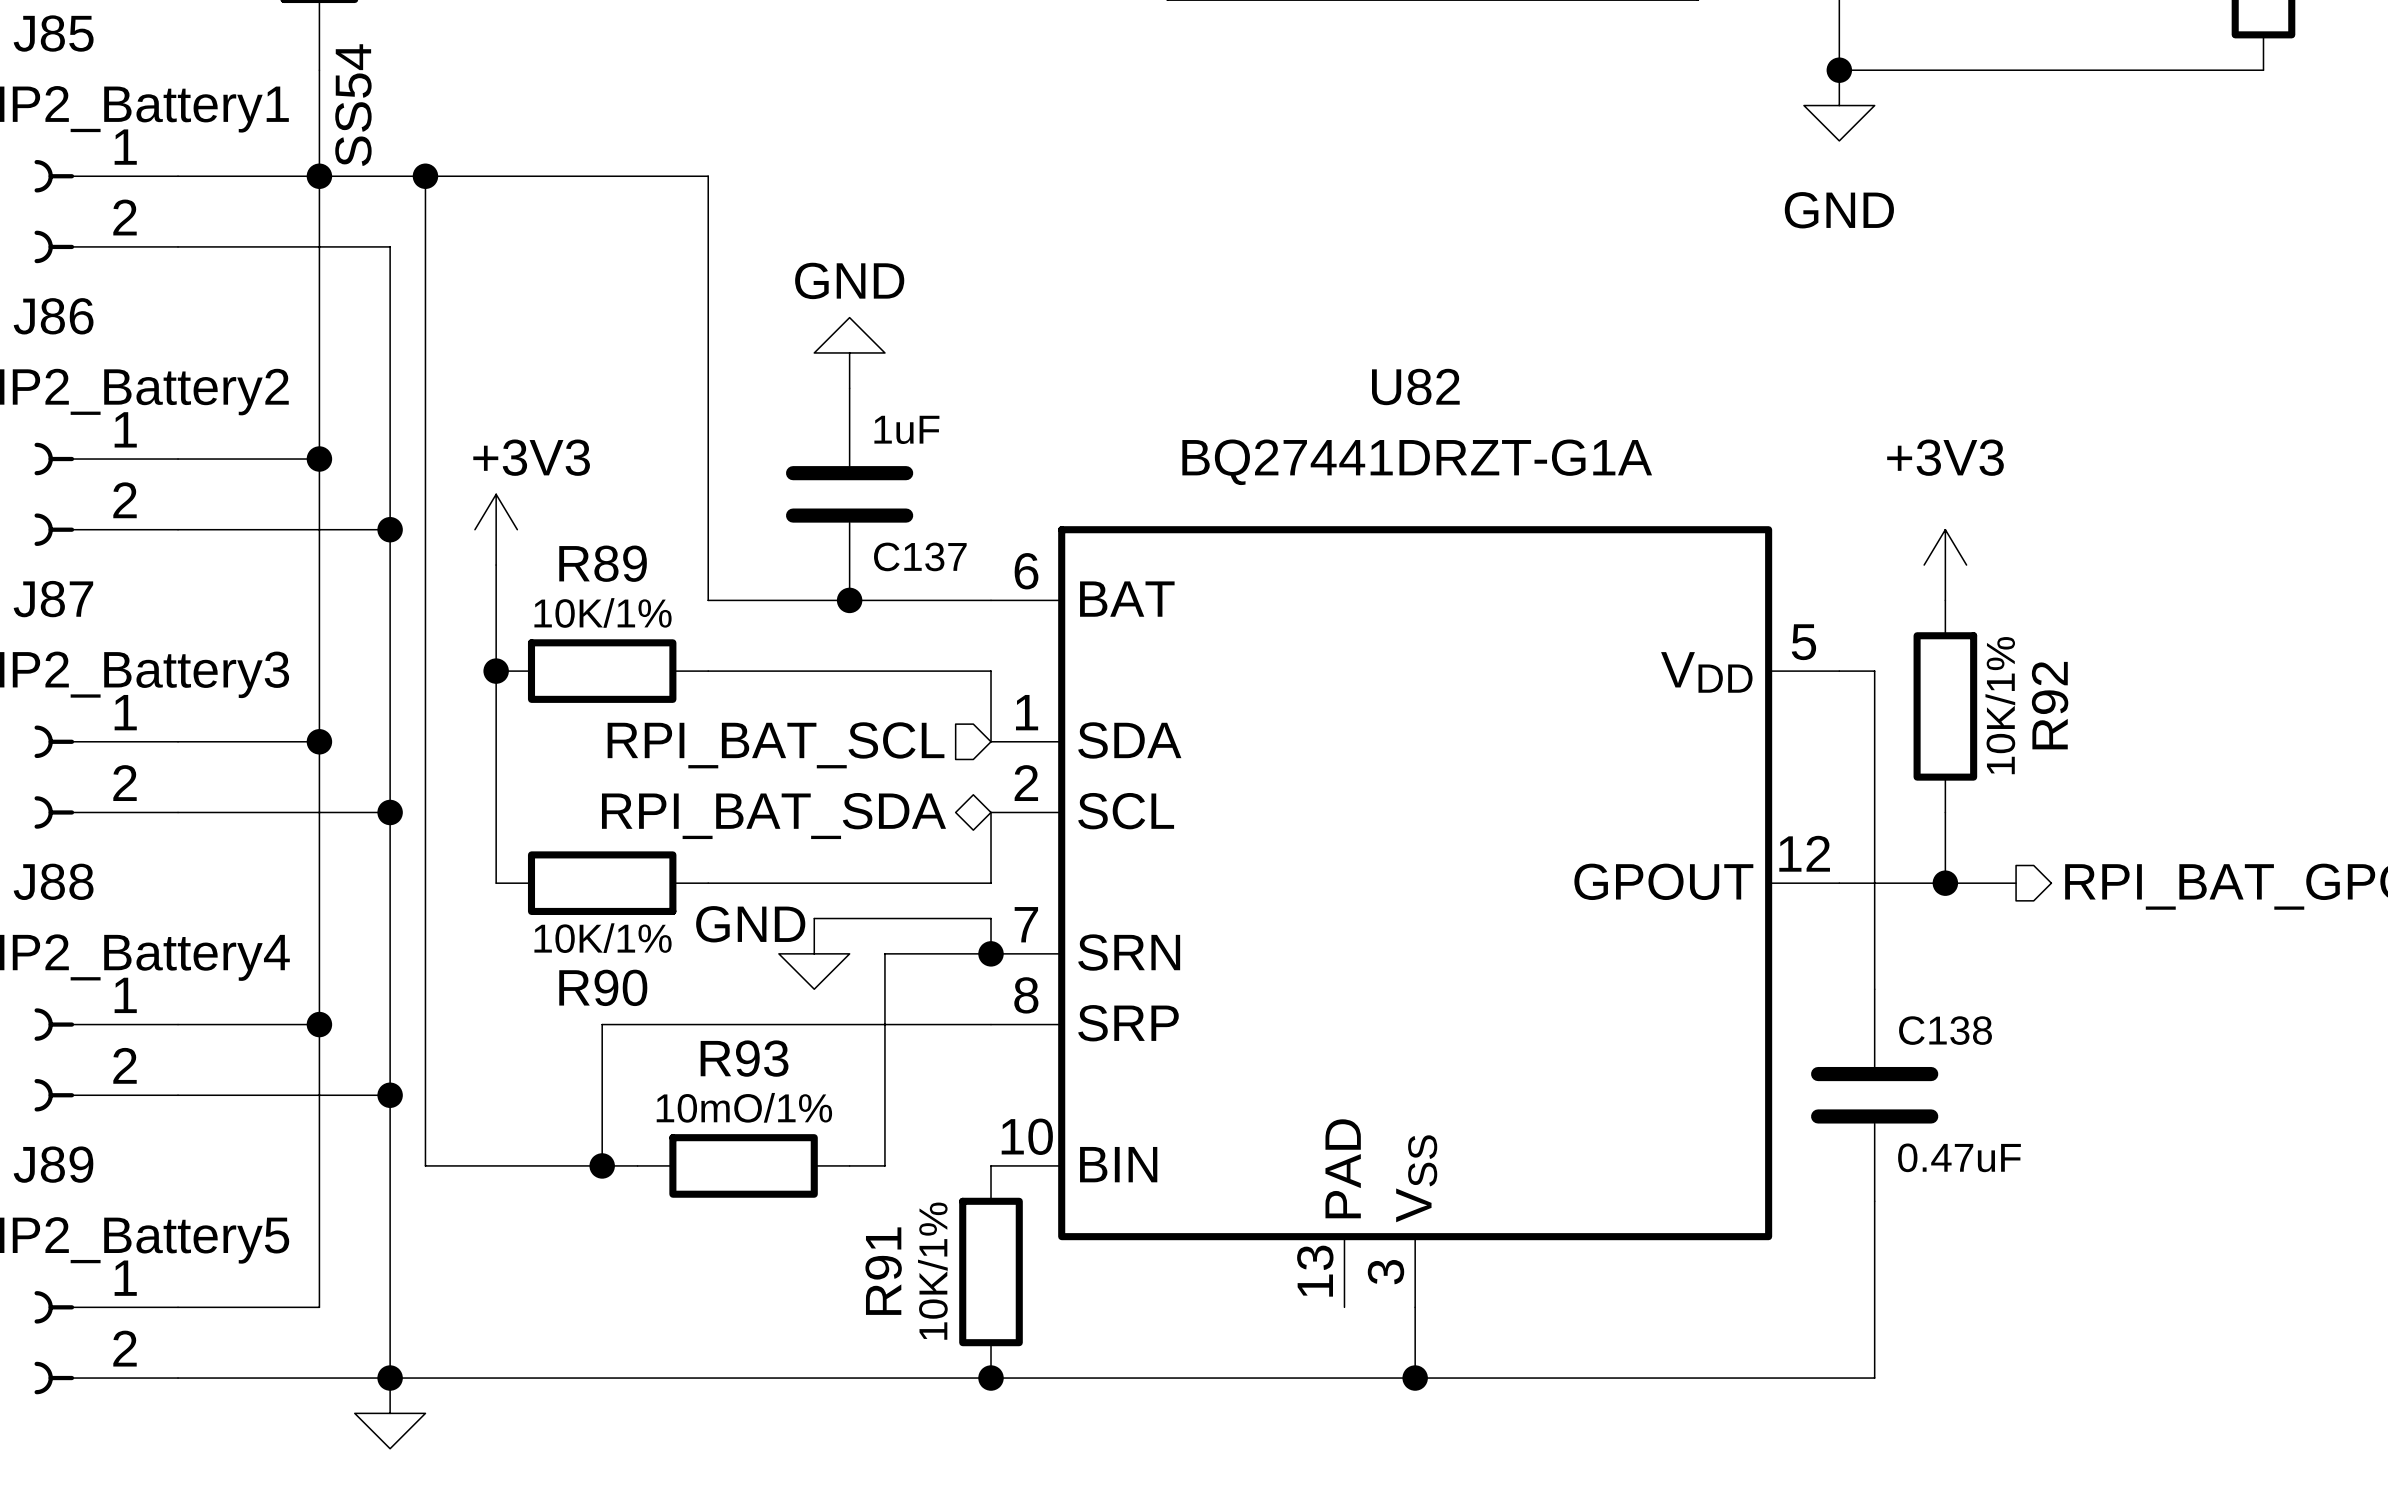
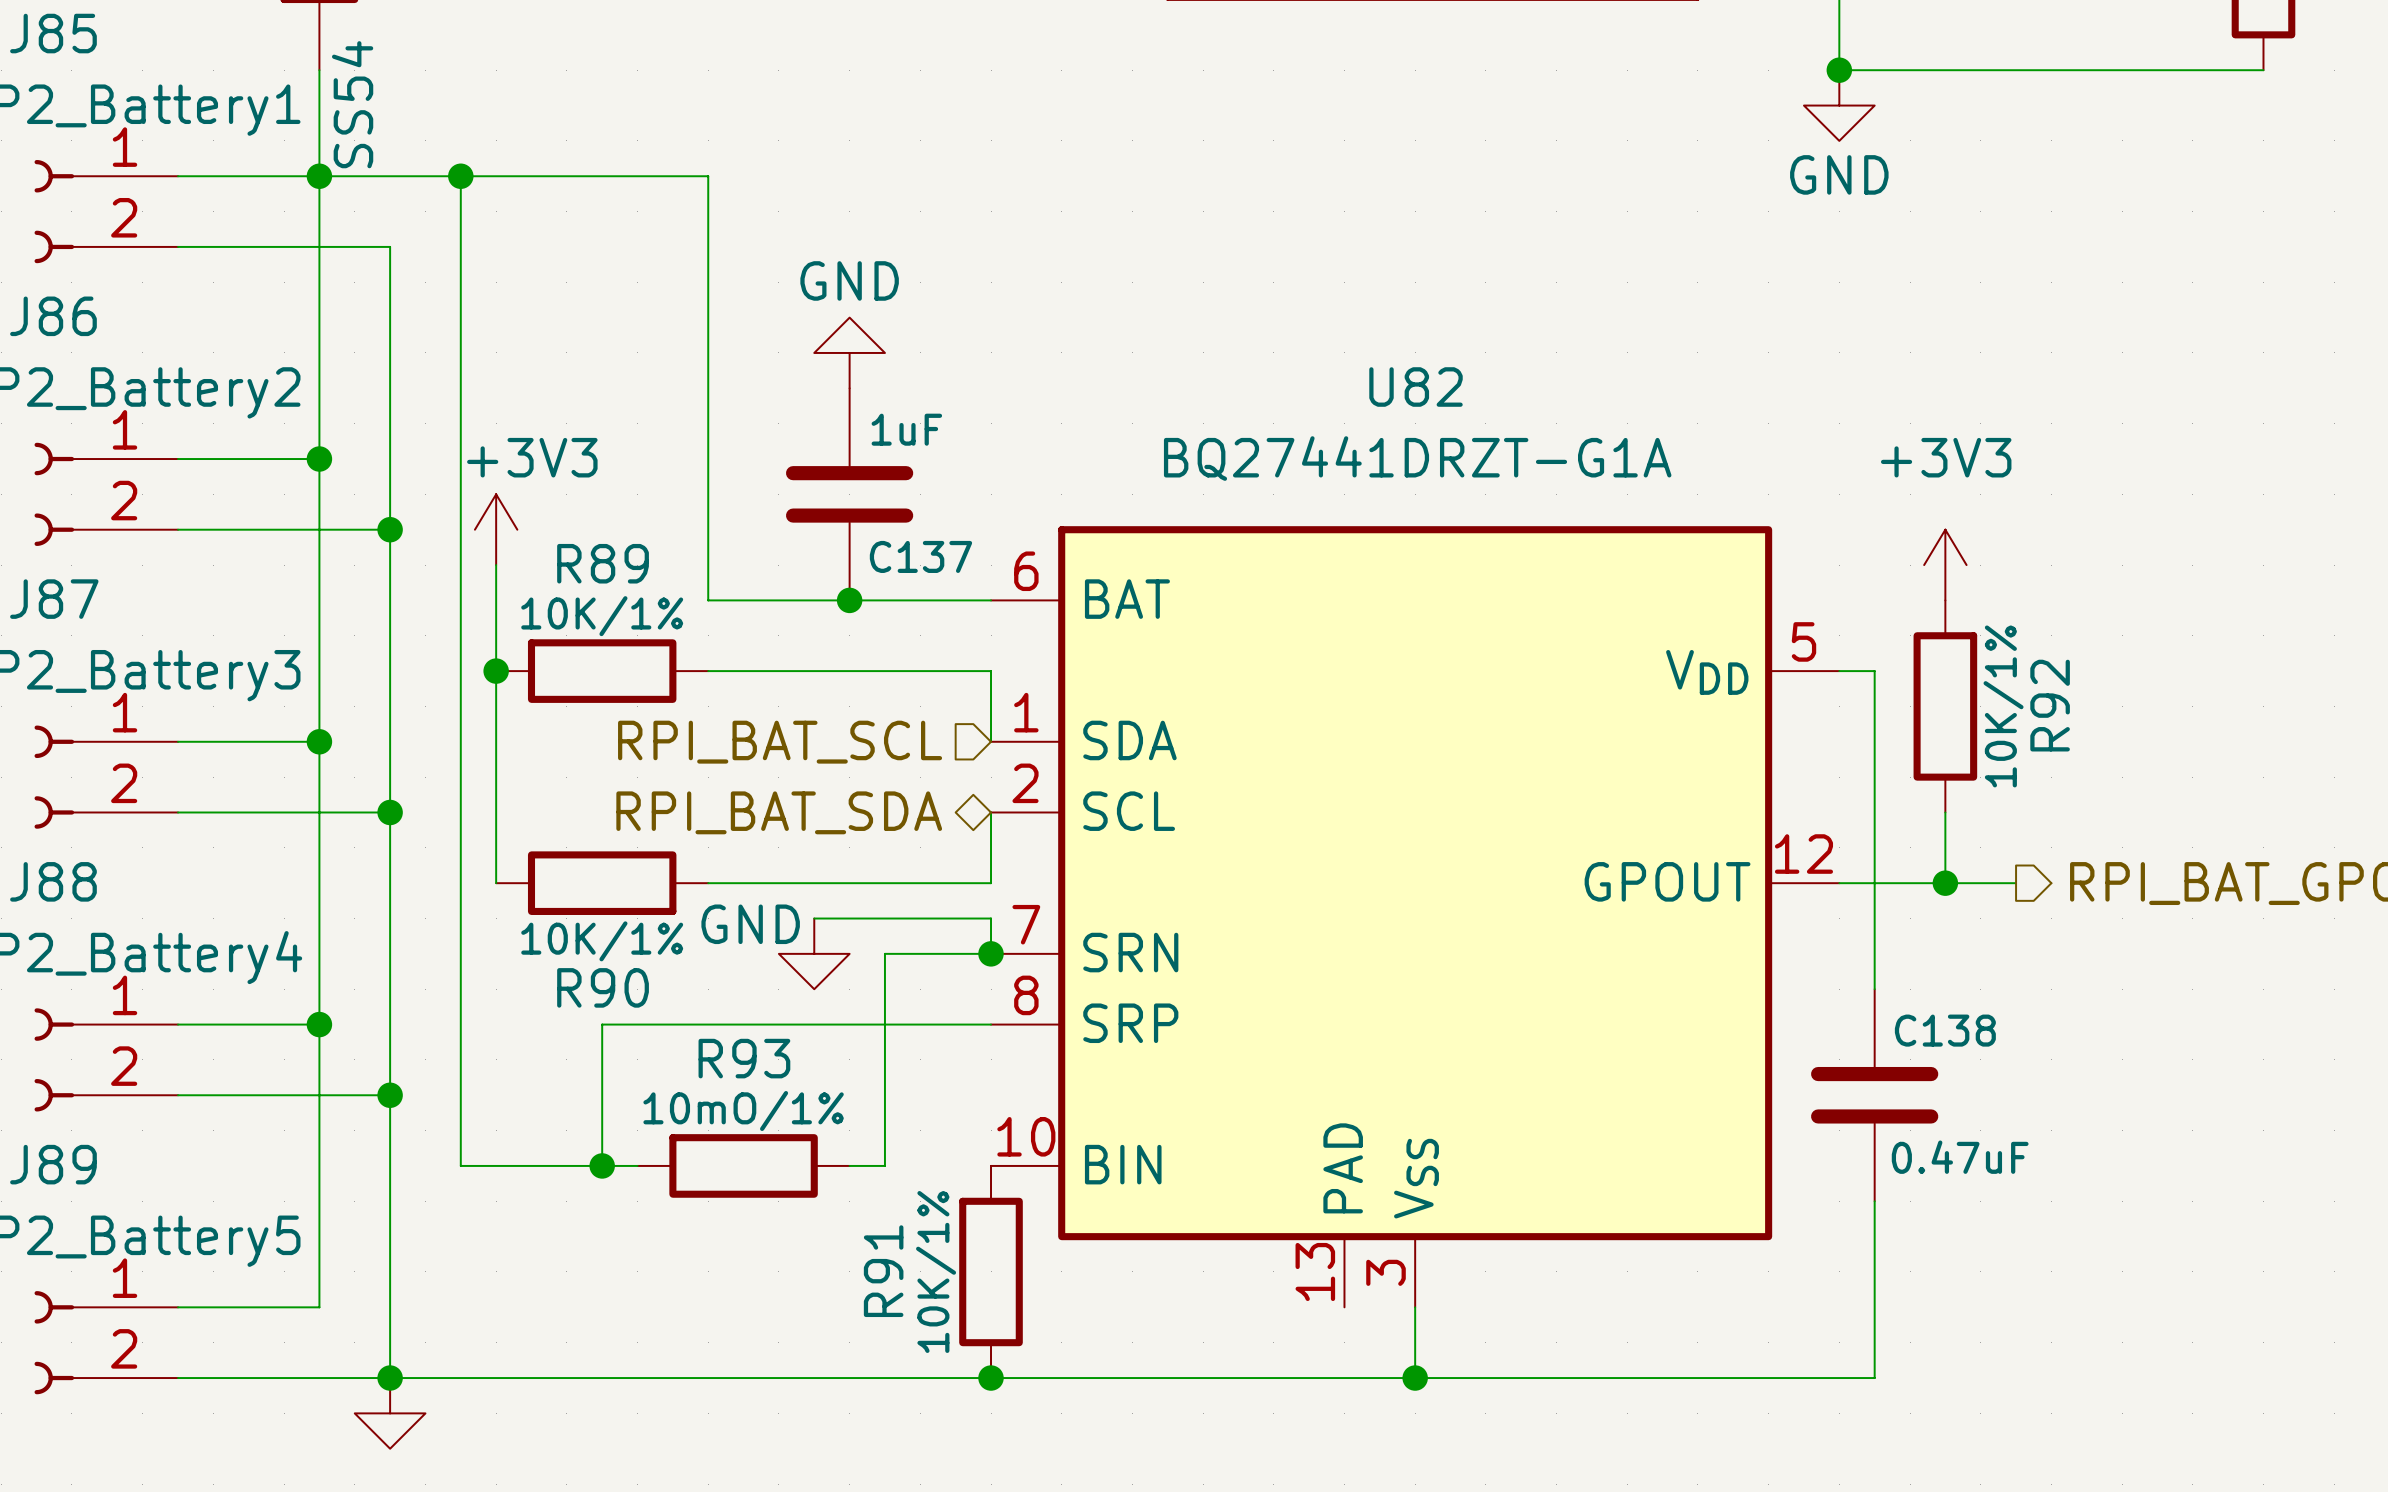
wire: (425, 176) (425, 1165) (460, 1165) -> (460, 176) (460, 1165)
junction position: (425, 176) -> (460, 176)
power symbol text position: GND (1839, 210) -> GND (1839, 174)

